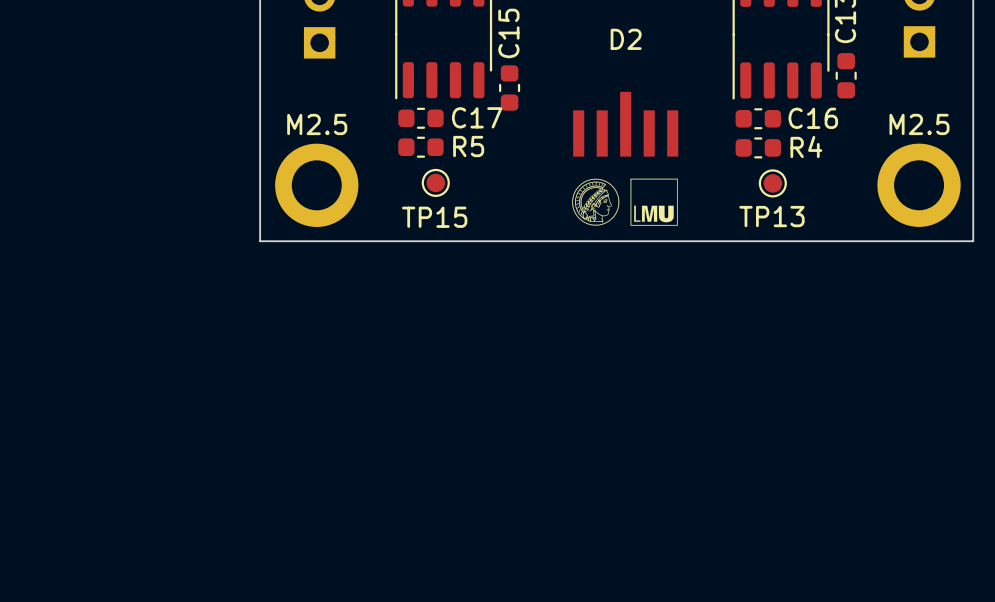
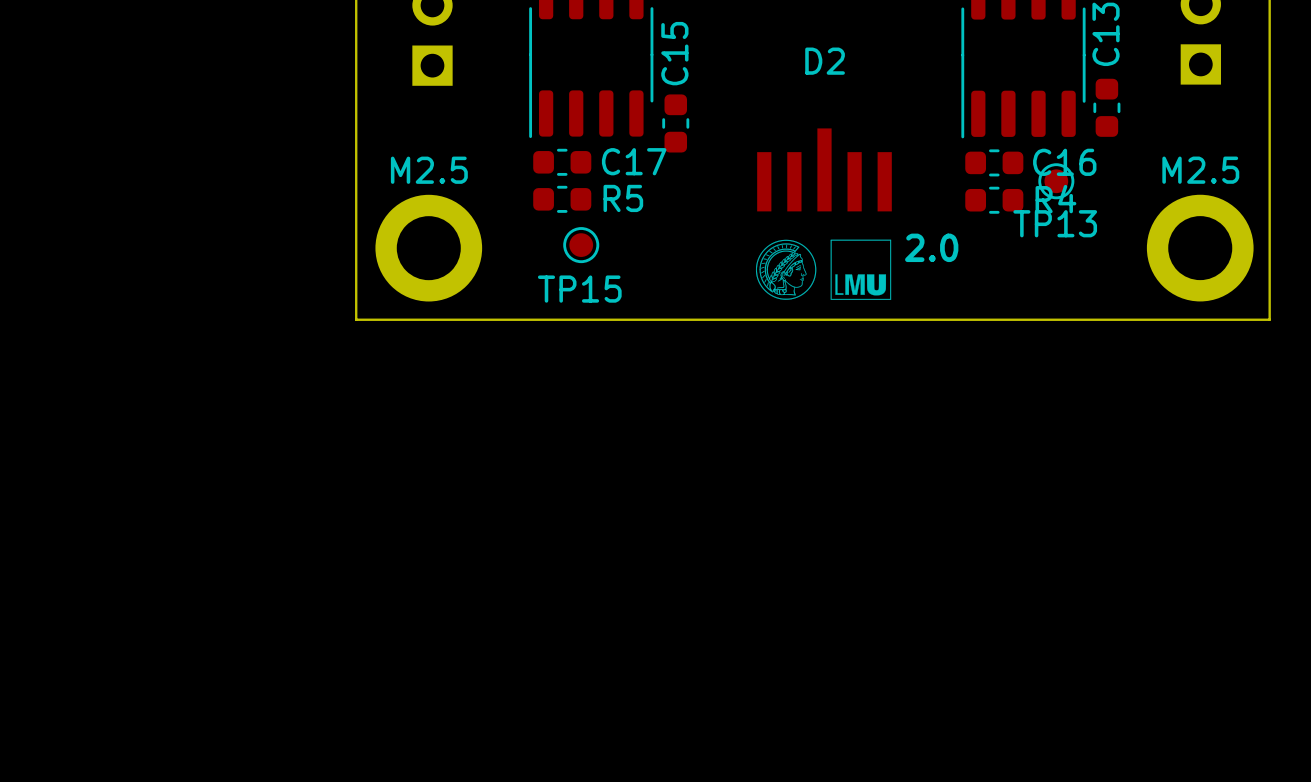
TP13 position: (772, 183) -> (1056, 181)
text: none -> 2.0 (931, 247)

